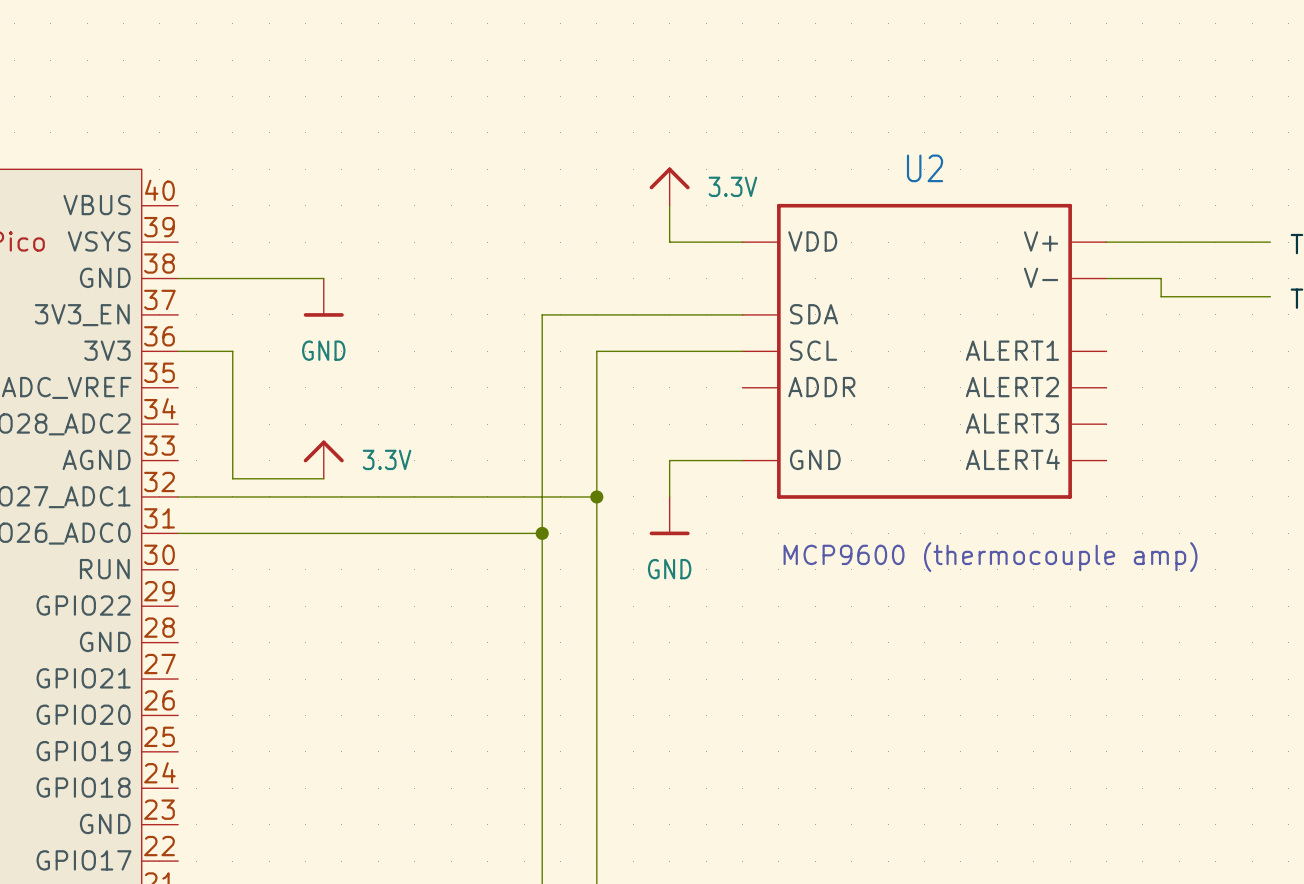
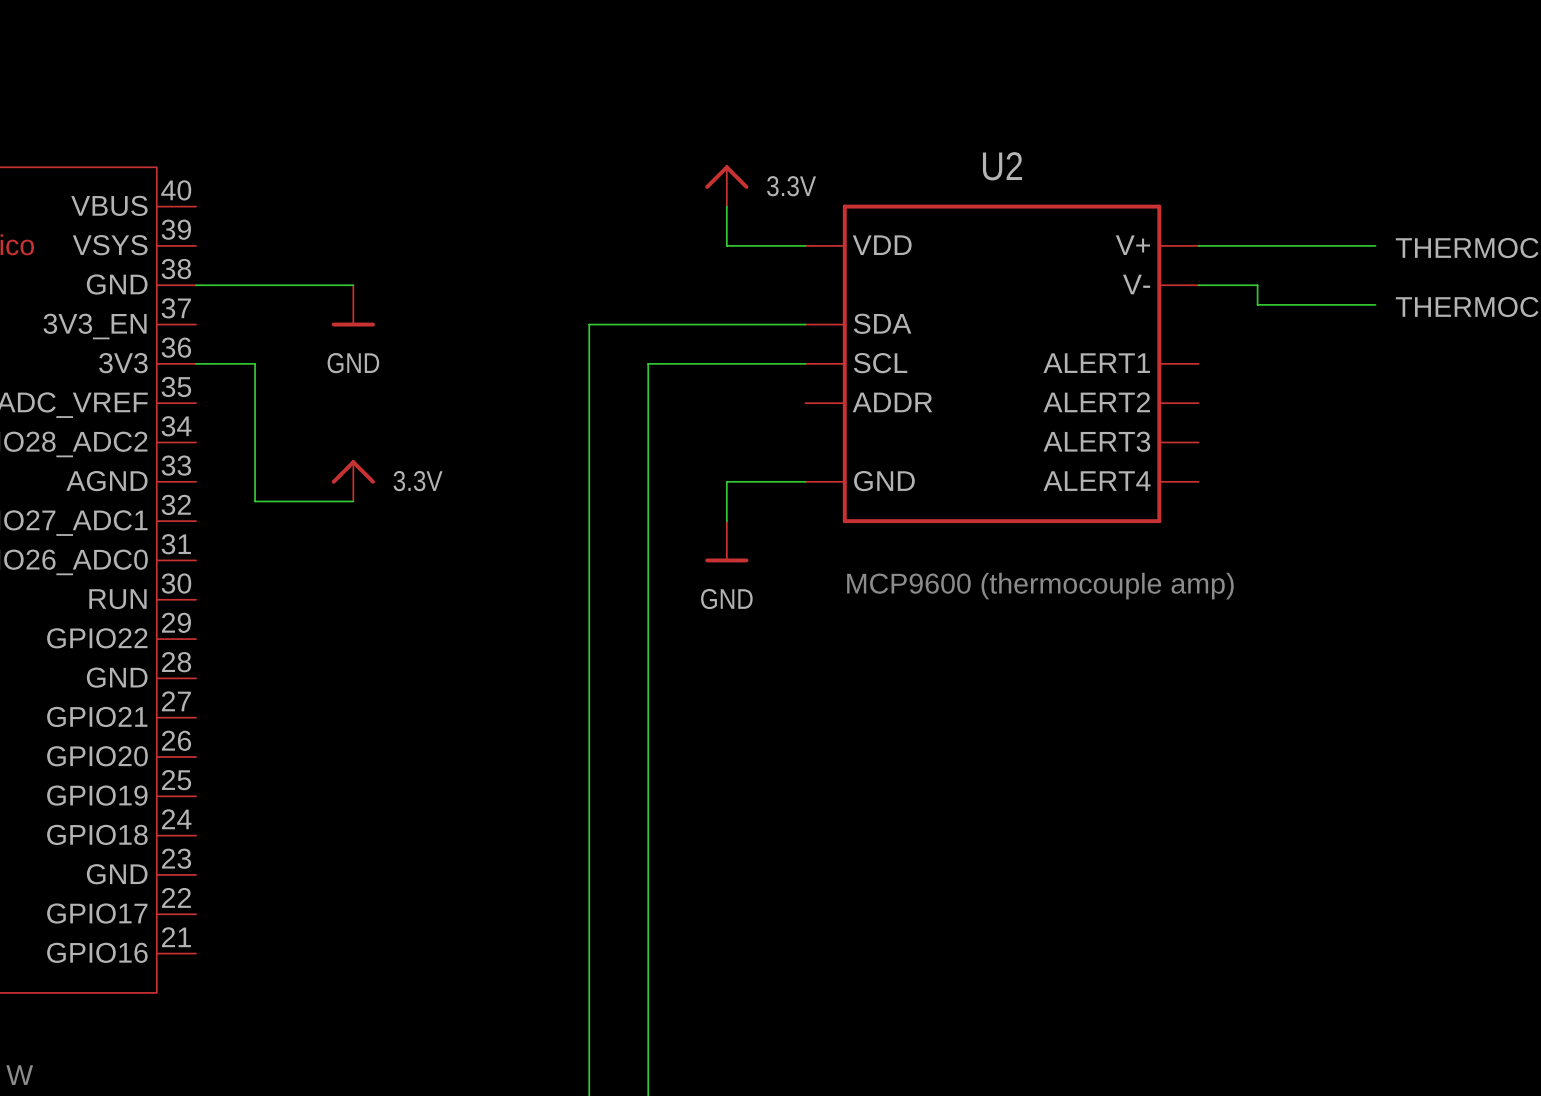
wire: (178, 496) (596, 496) -> none
junction: (596, 496) -> none
wire: (178, 533) (542, 533) -> none
junction: (542, 533) -> none

